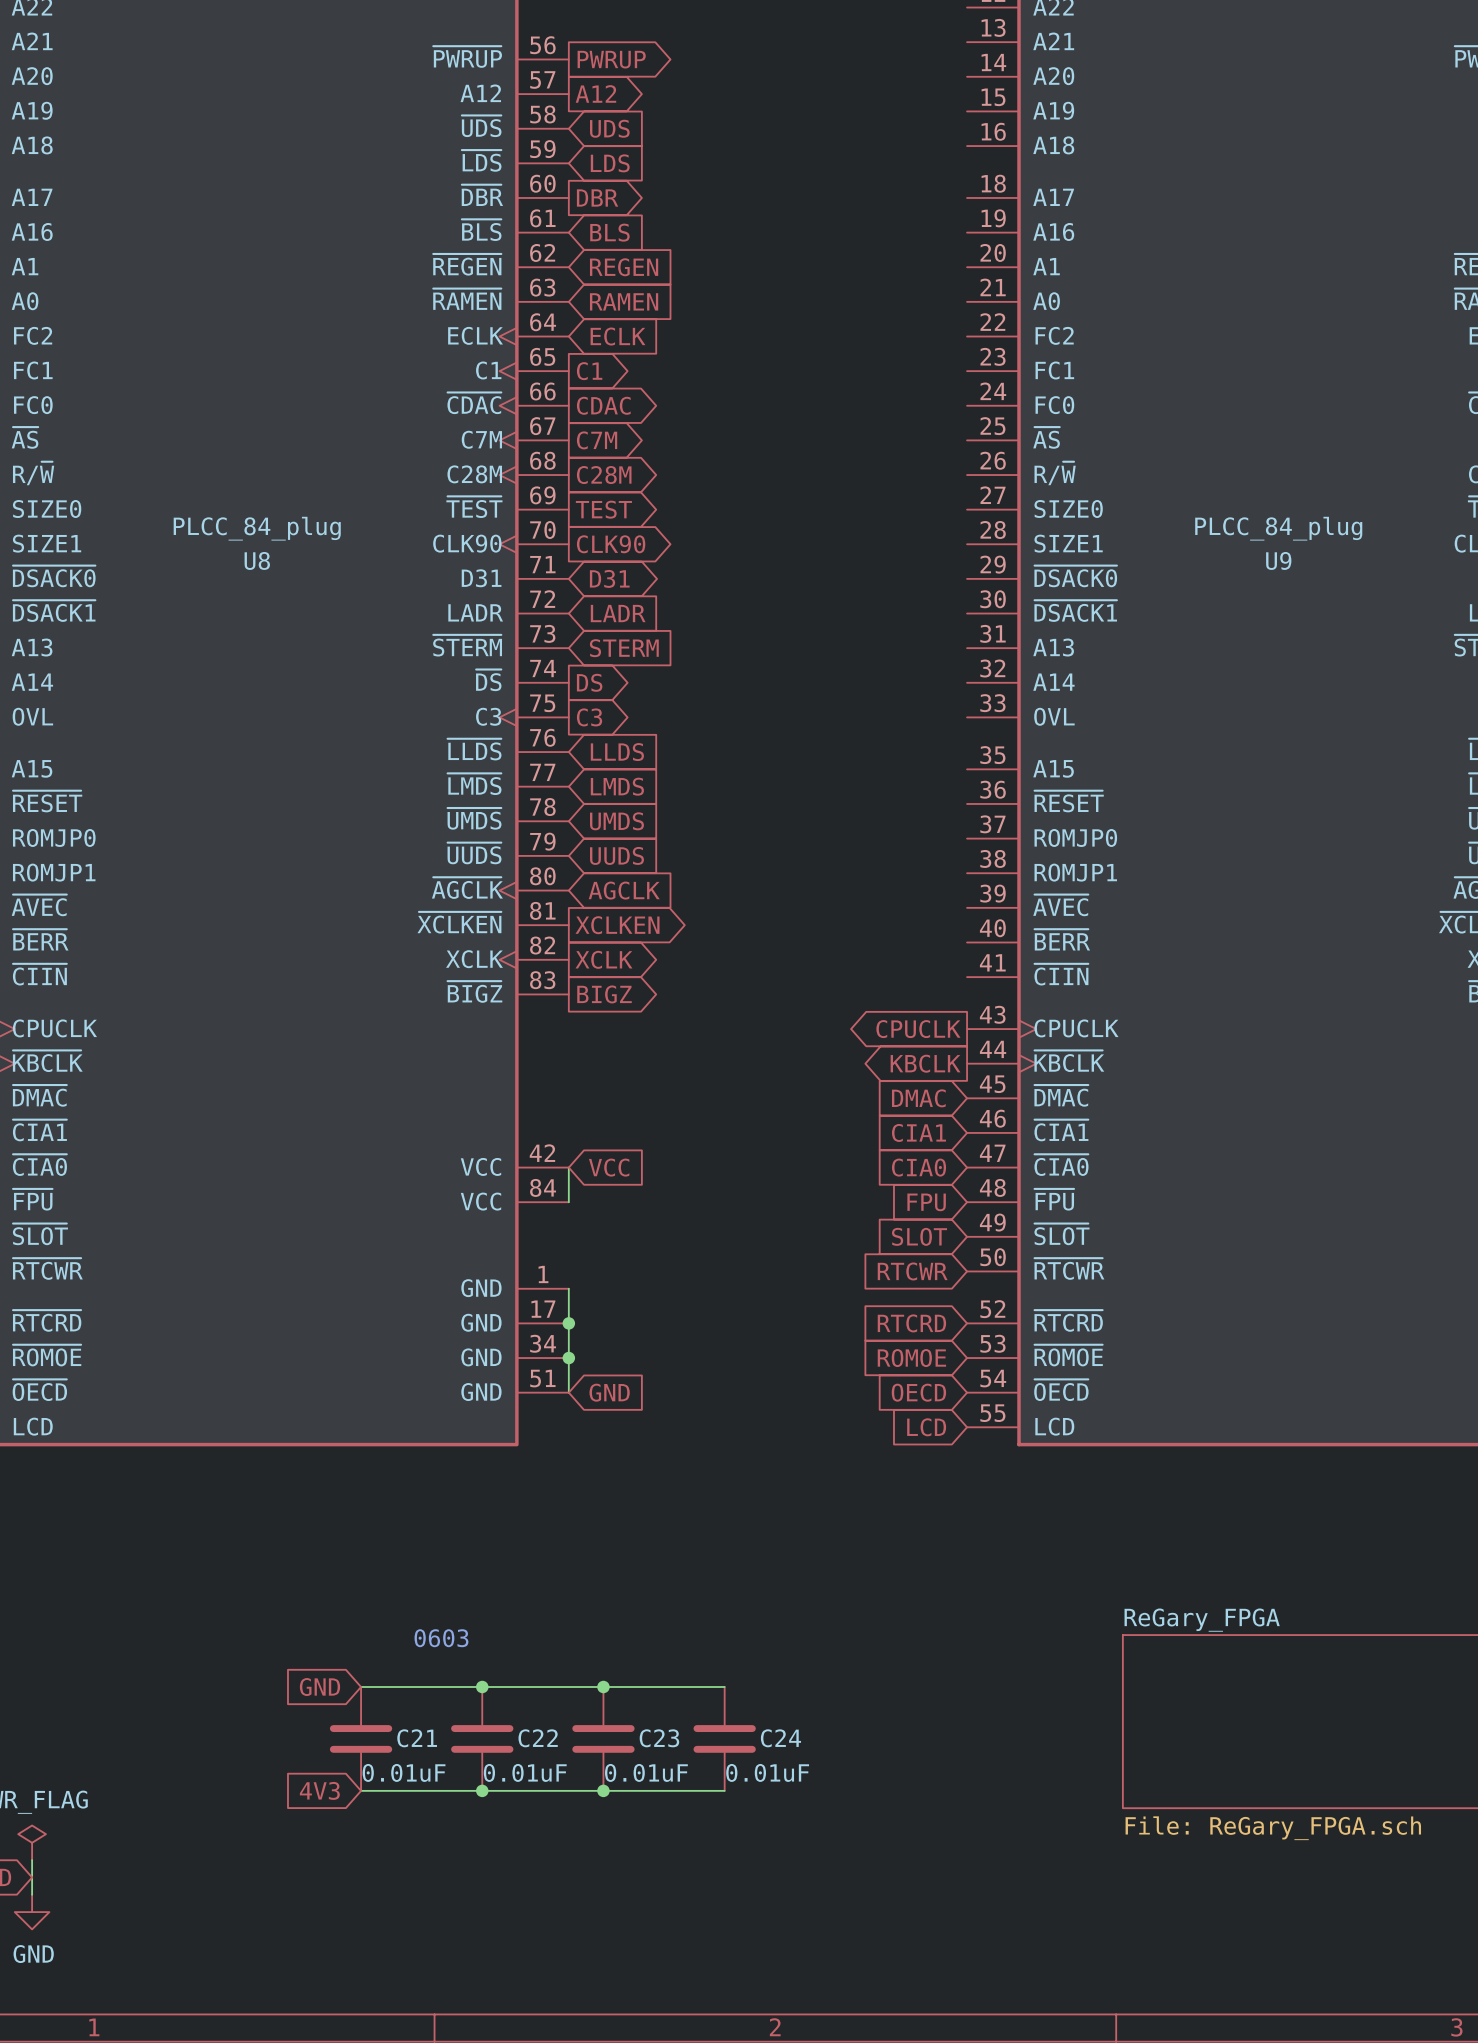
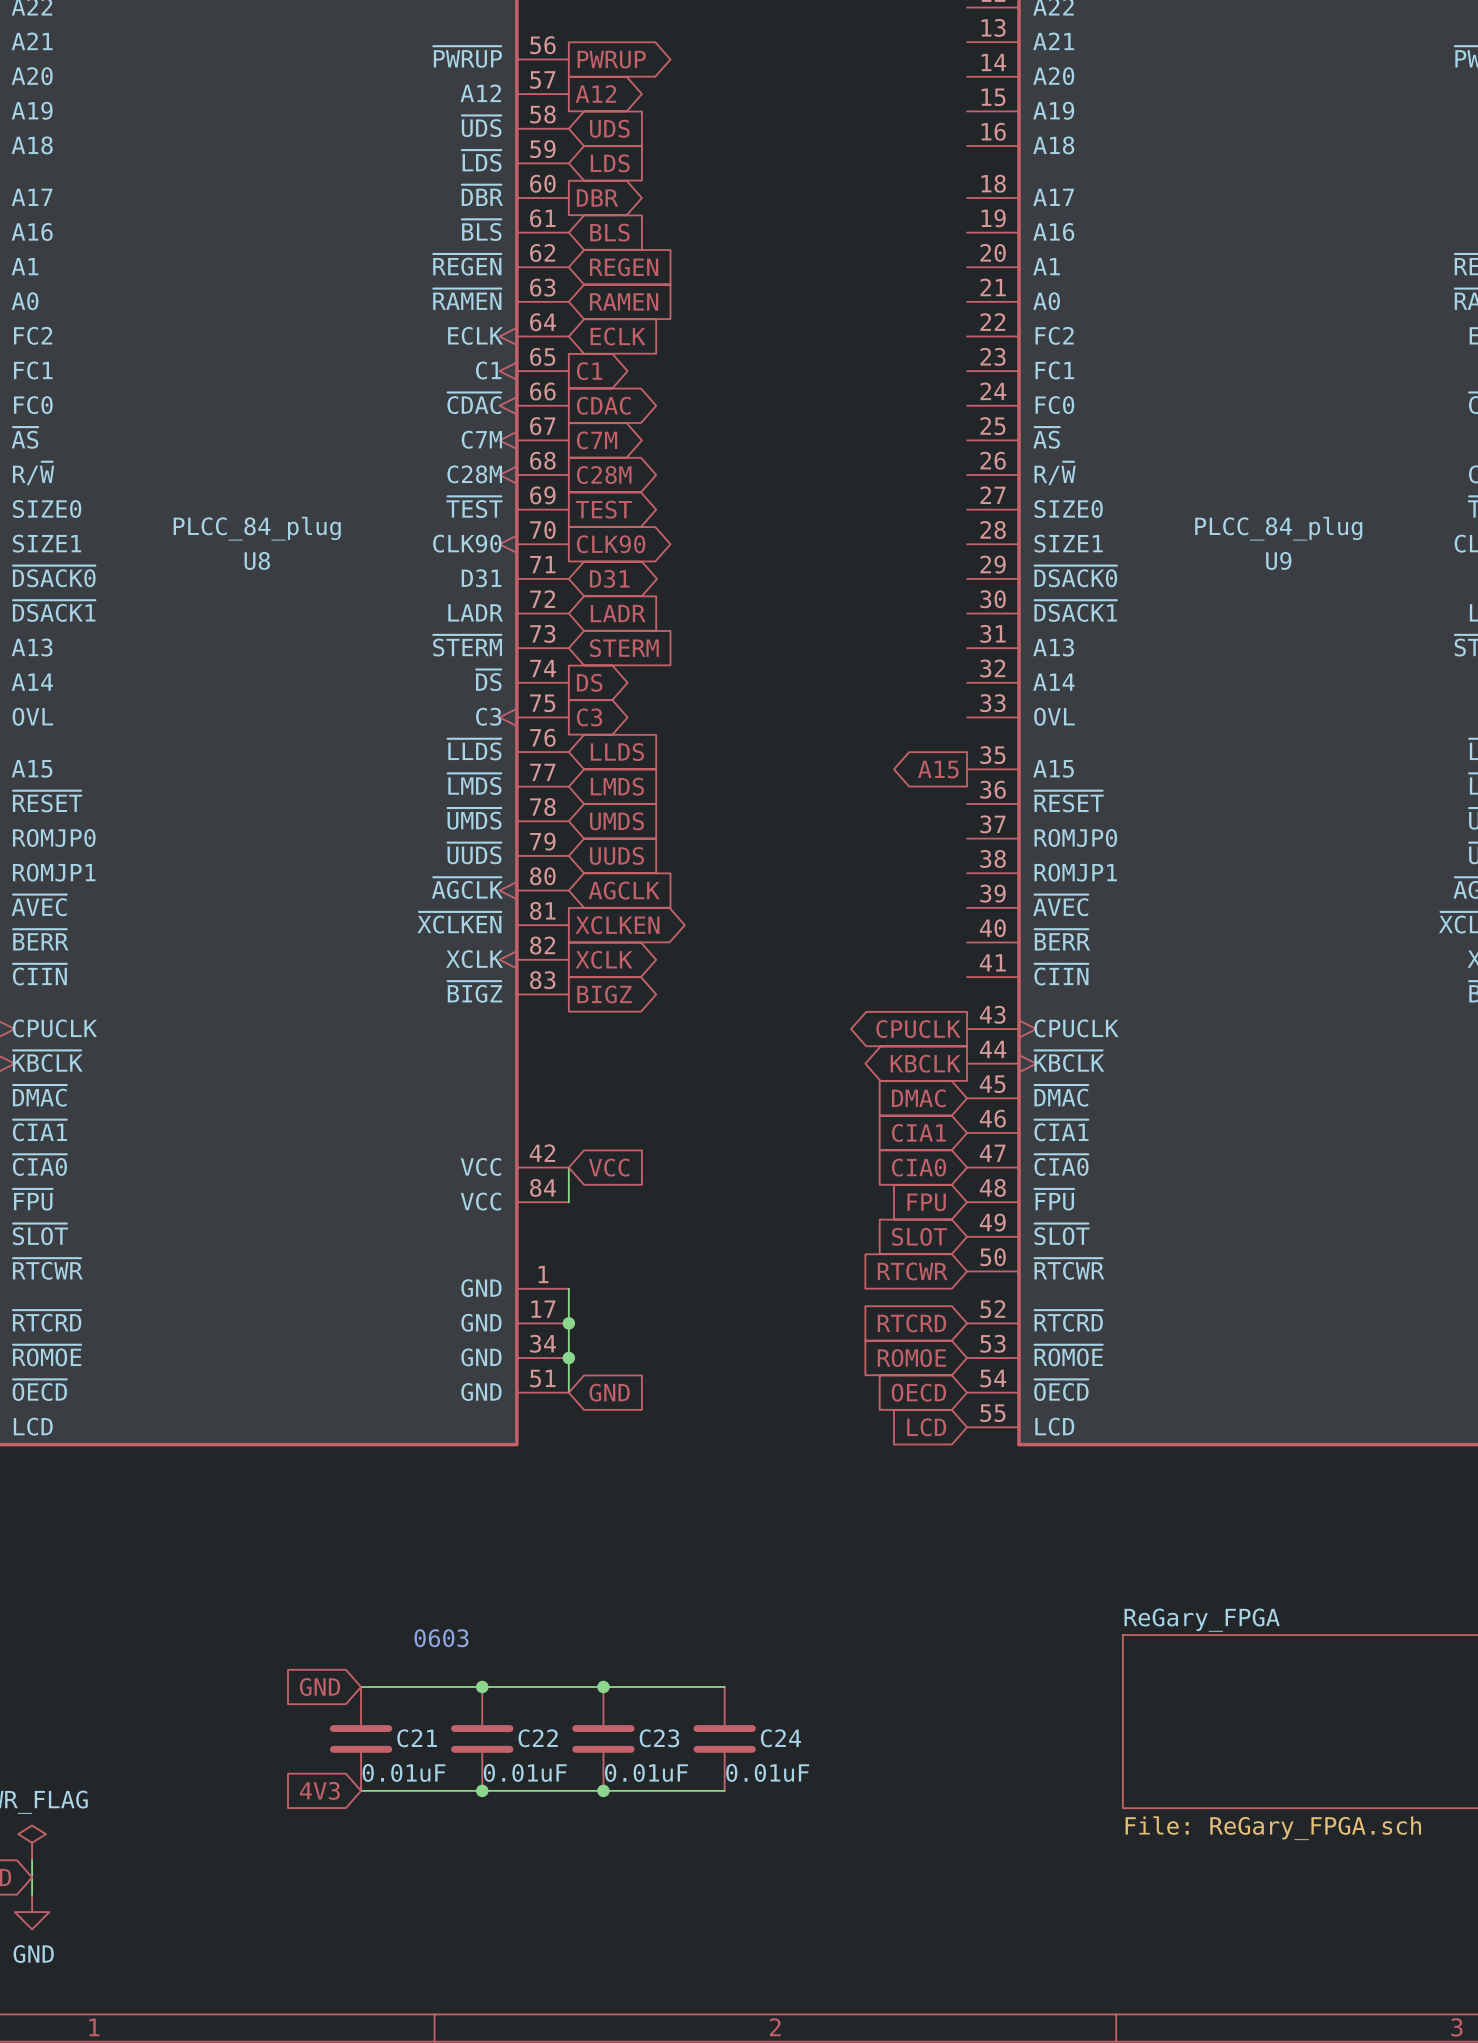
global label: none -> A15 (938, 769)

